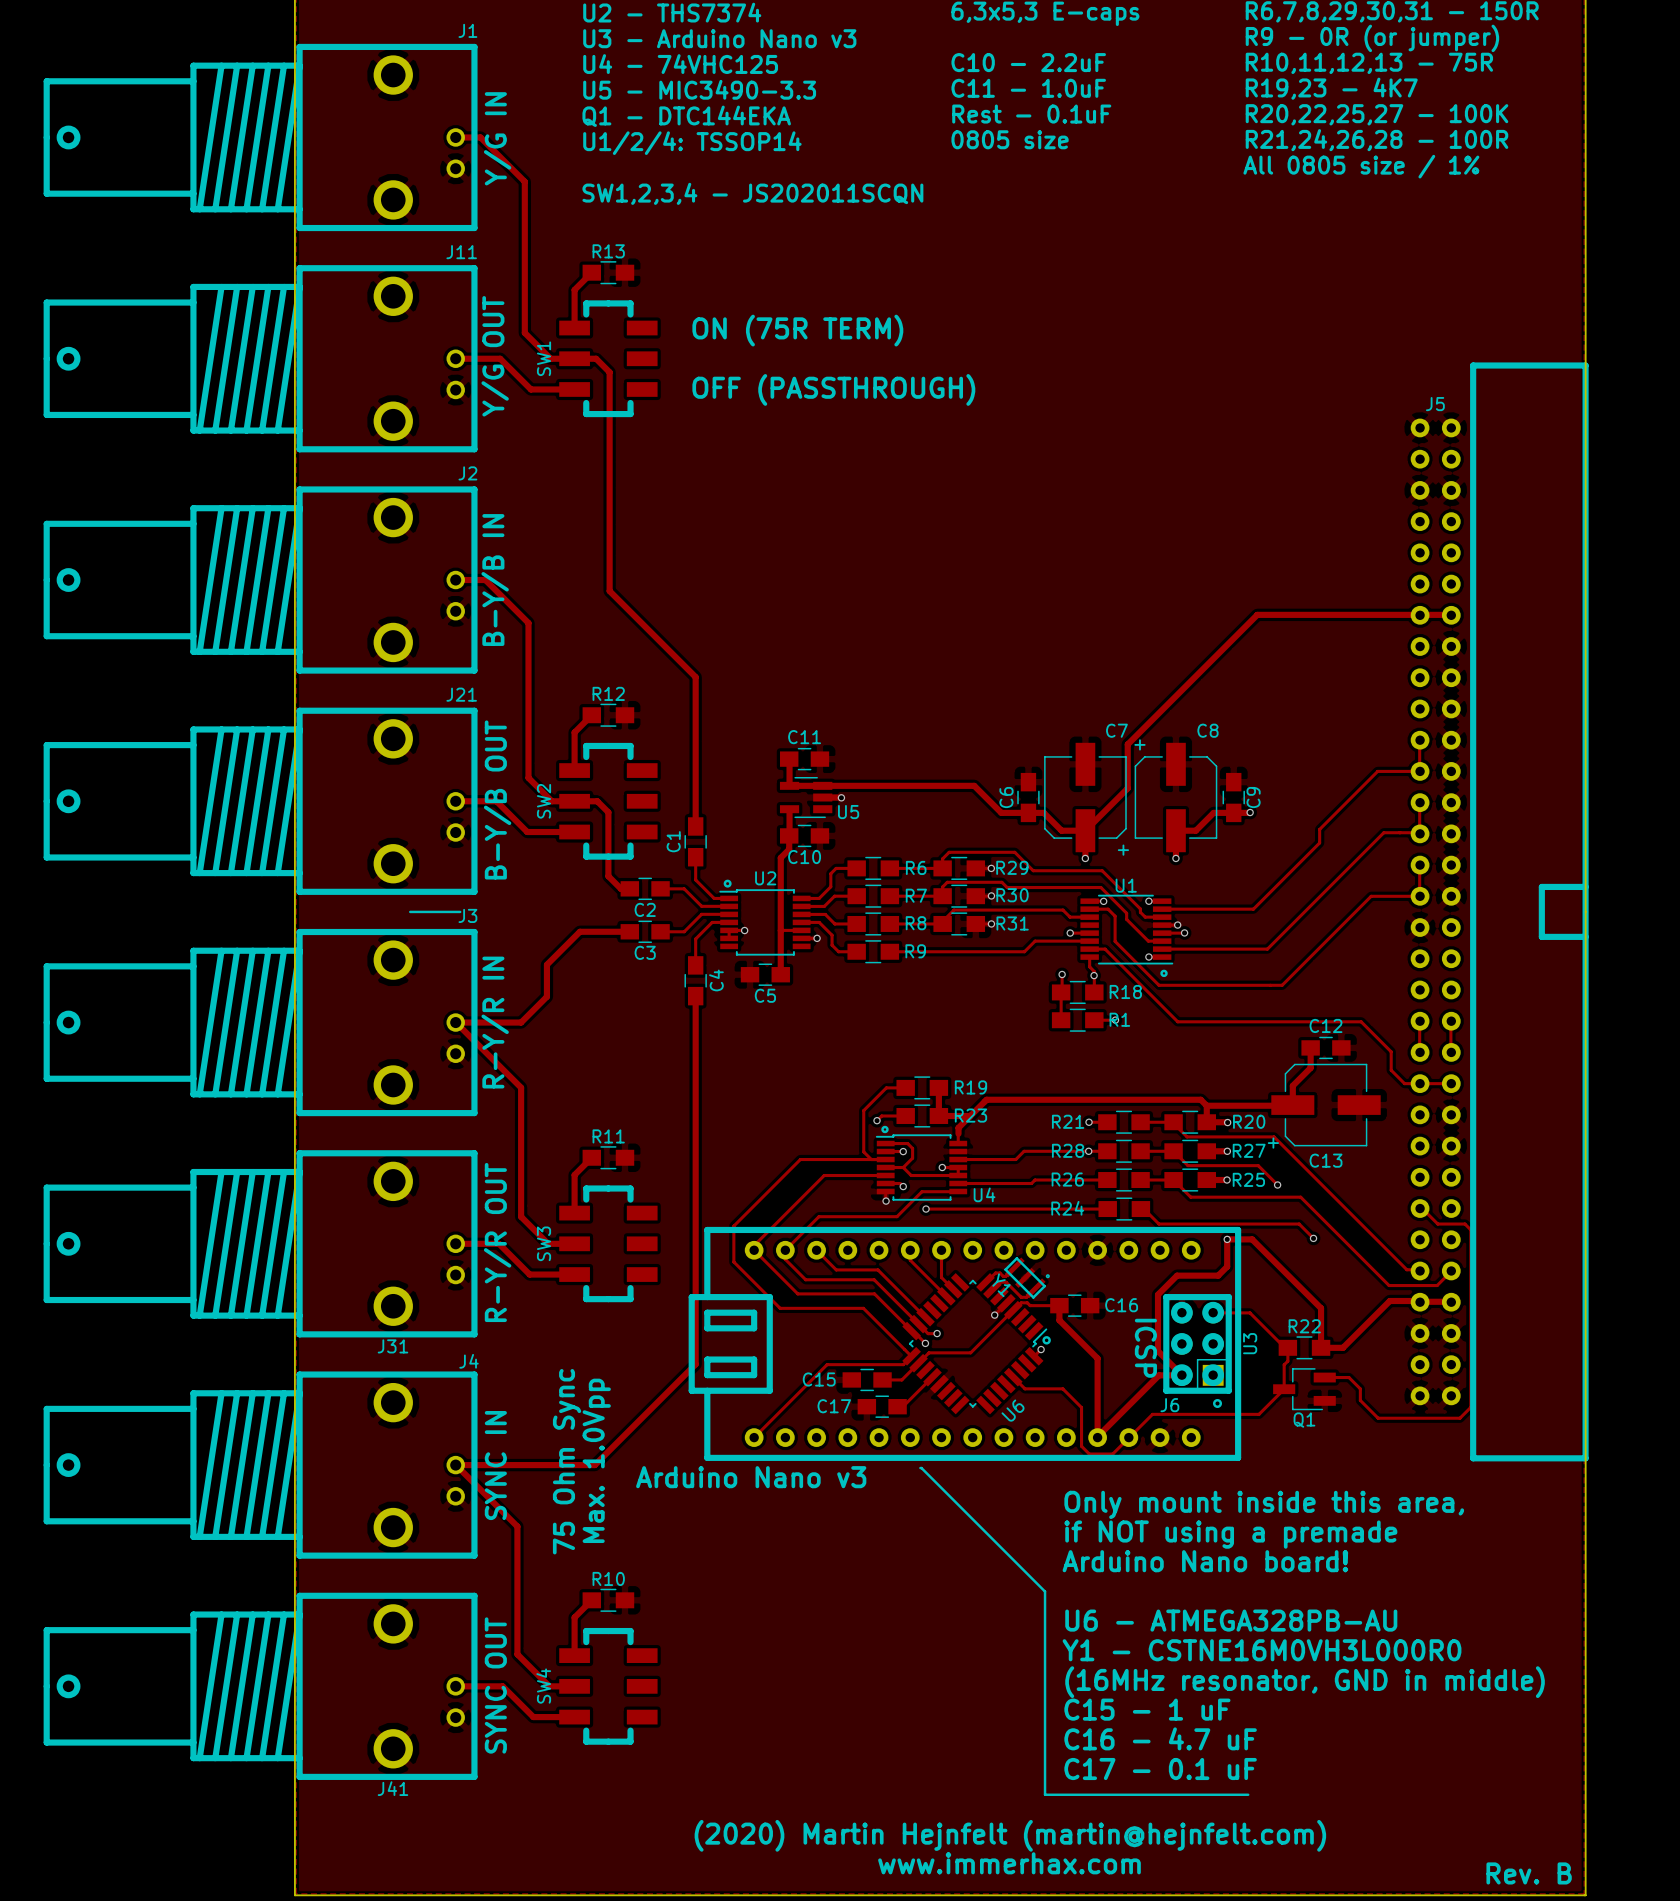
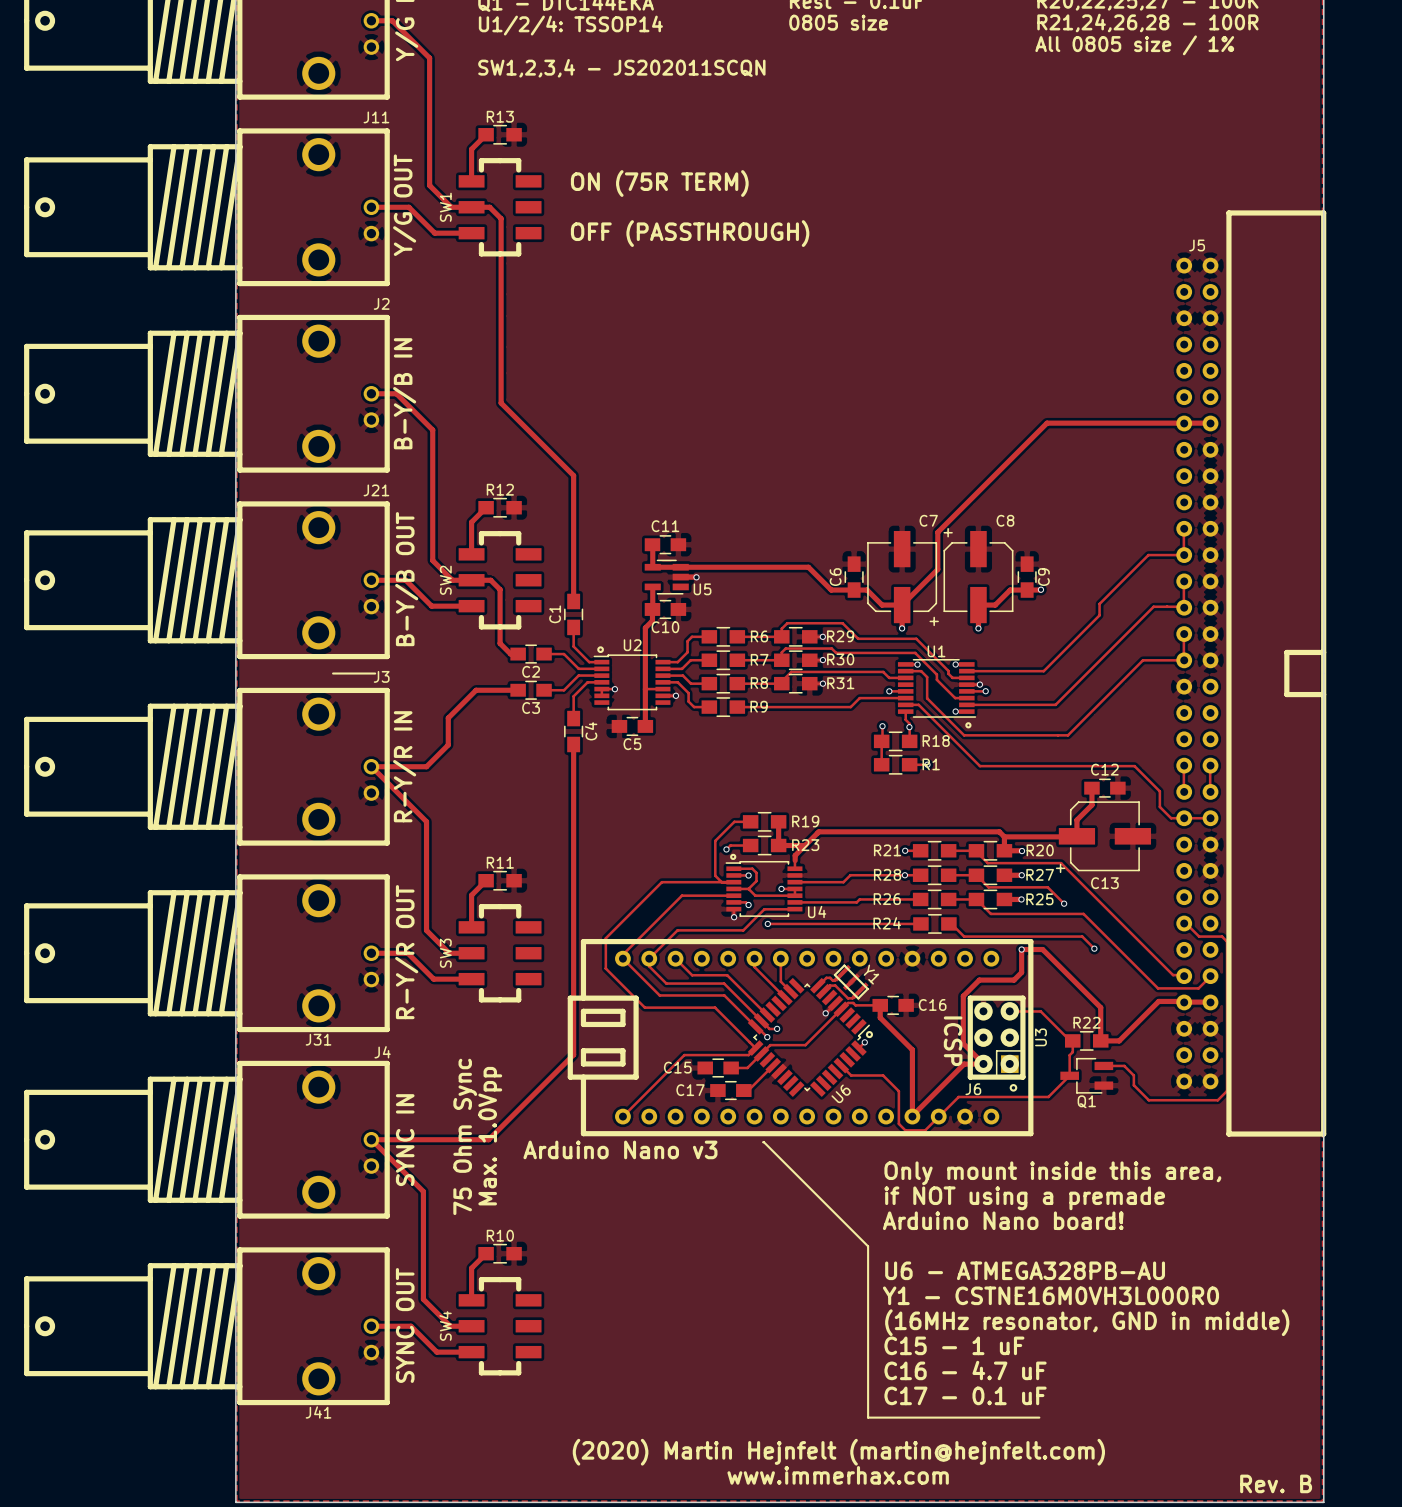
drawing: [1045, 1274, 1050, 1279] -> none
Y1 name position: Y1 (1001, 1285) -> Y1 (871, 974)

